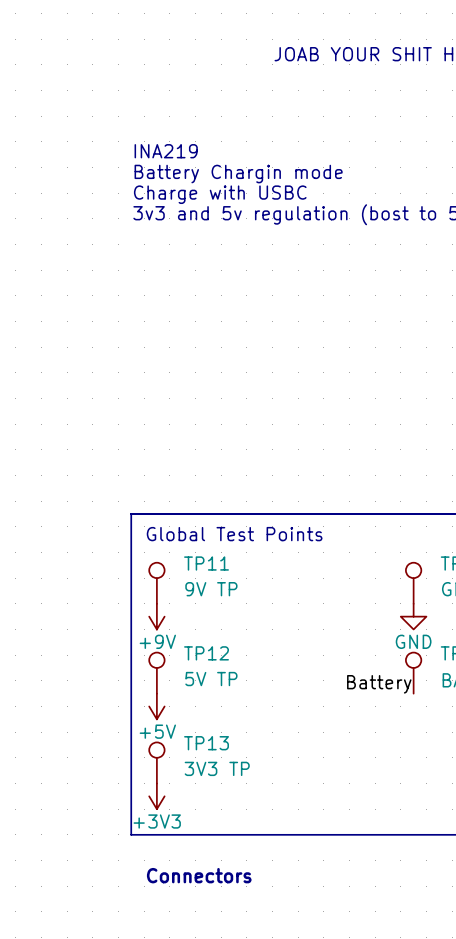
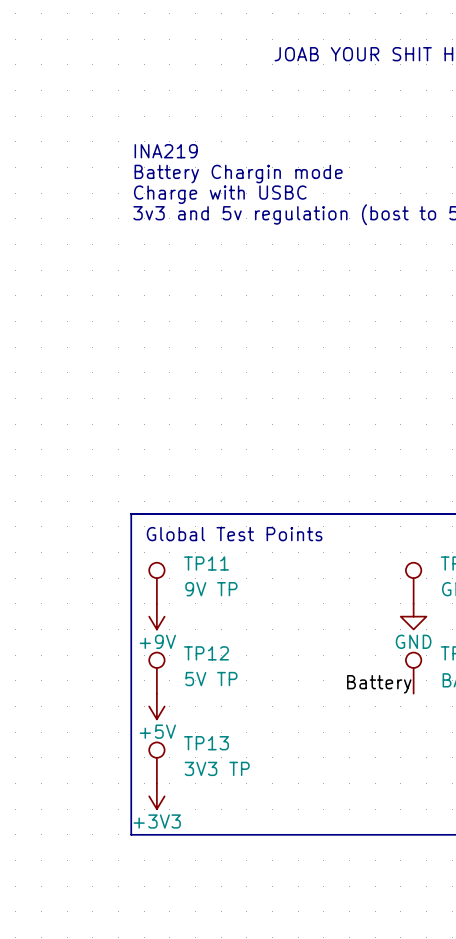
text: Connectors (199, 875) -> none

